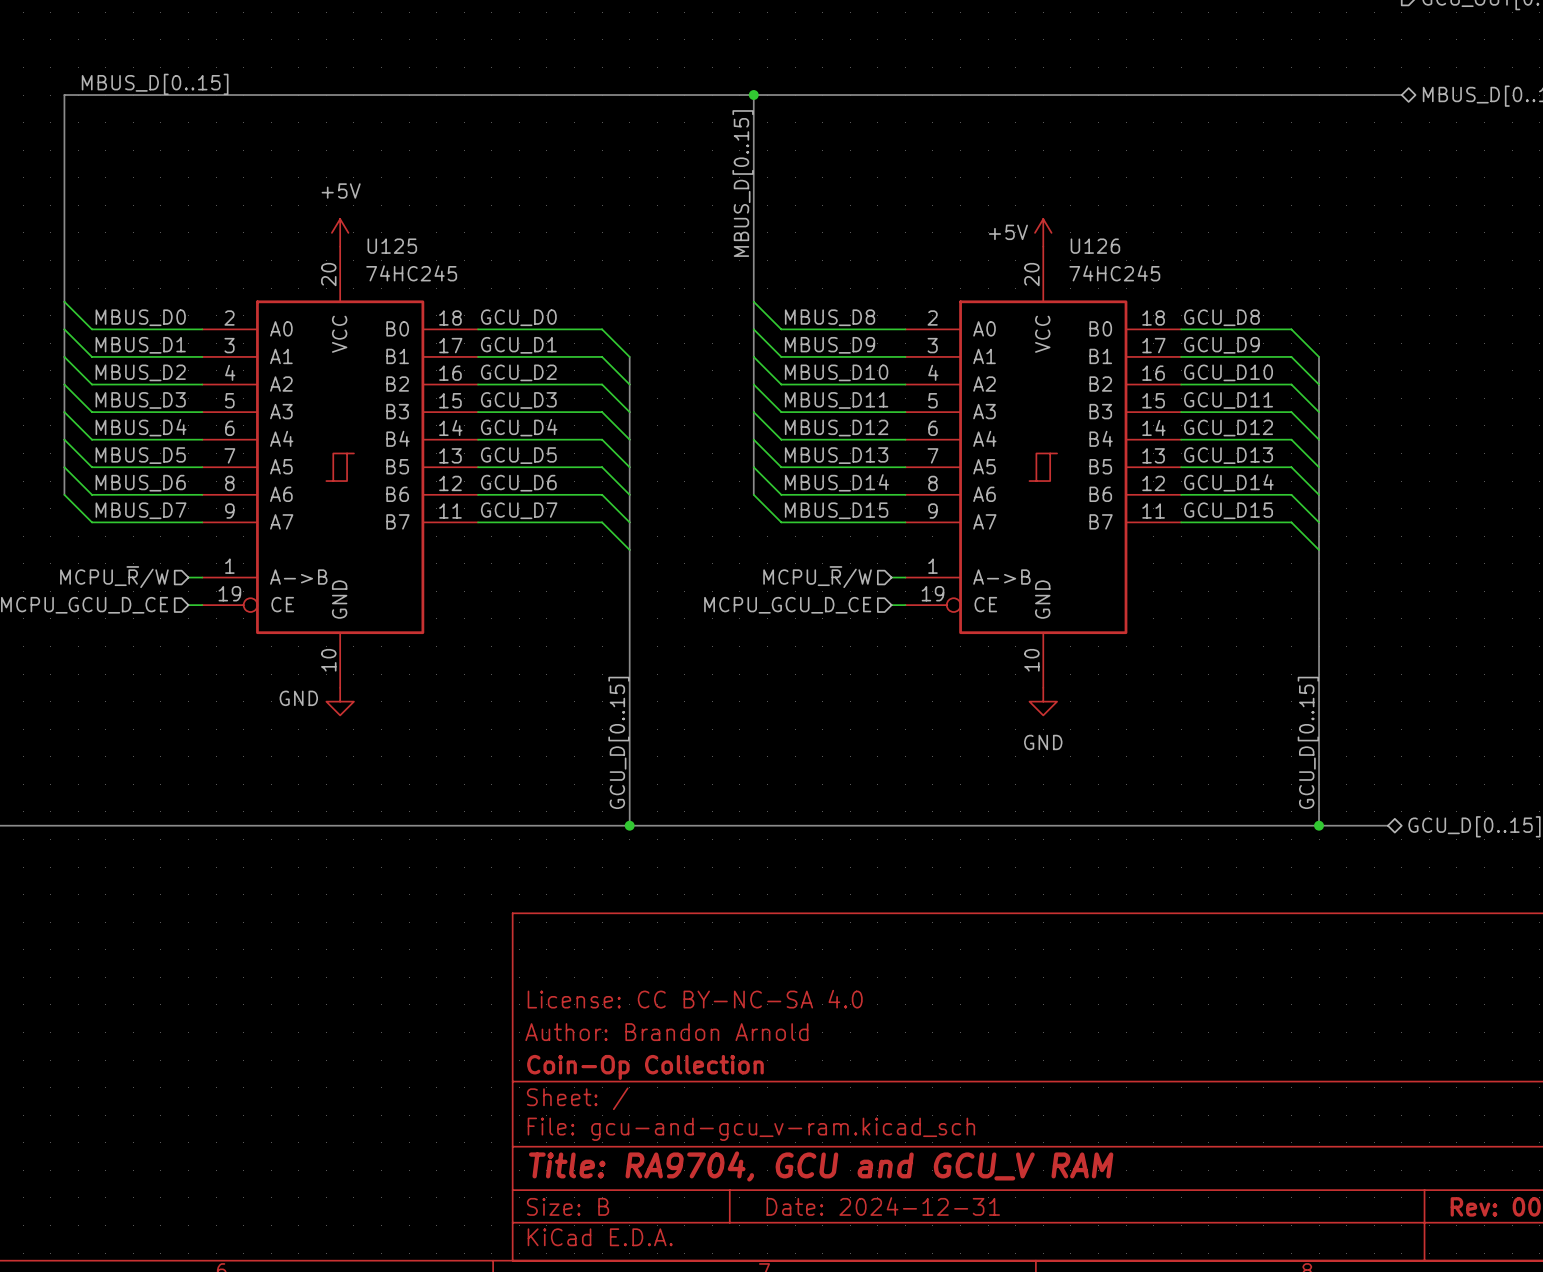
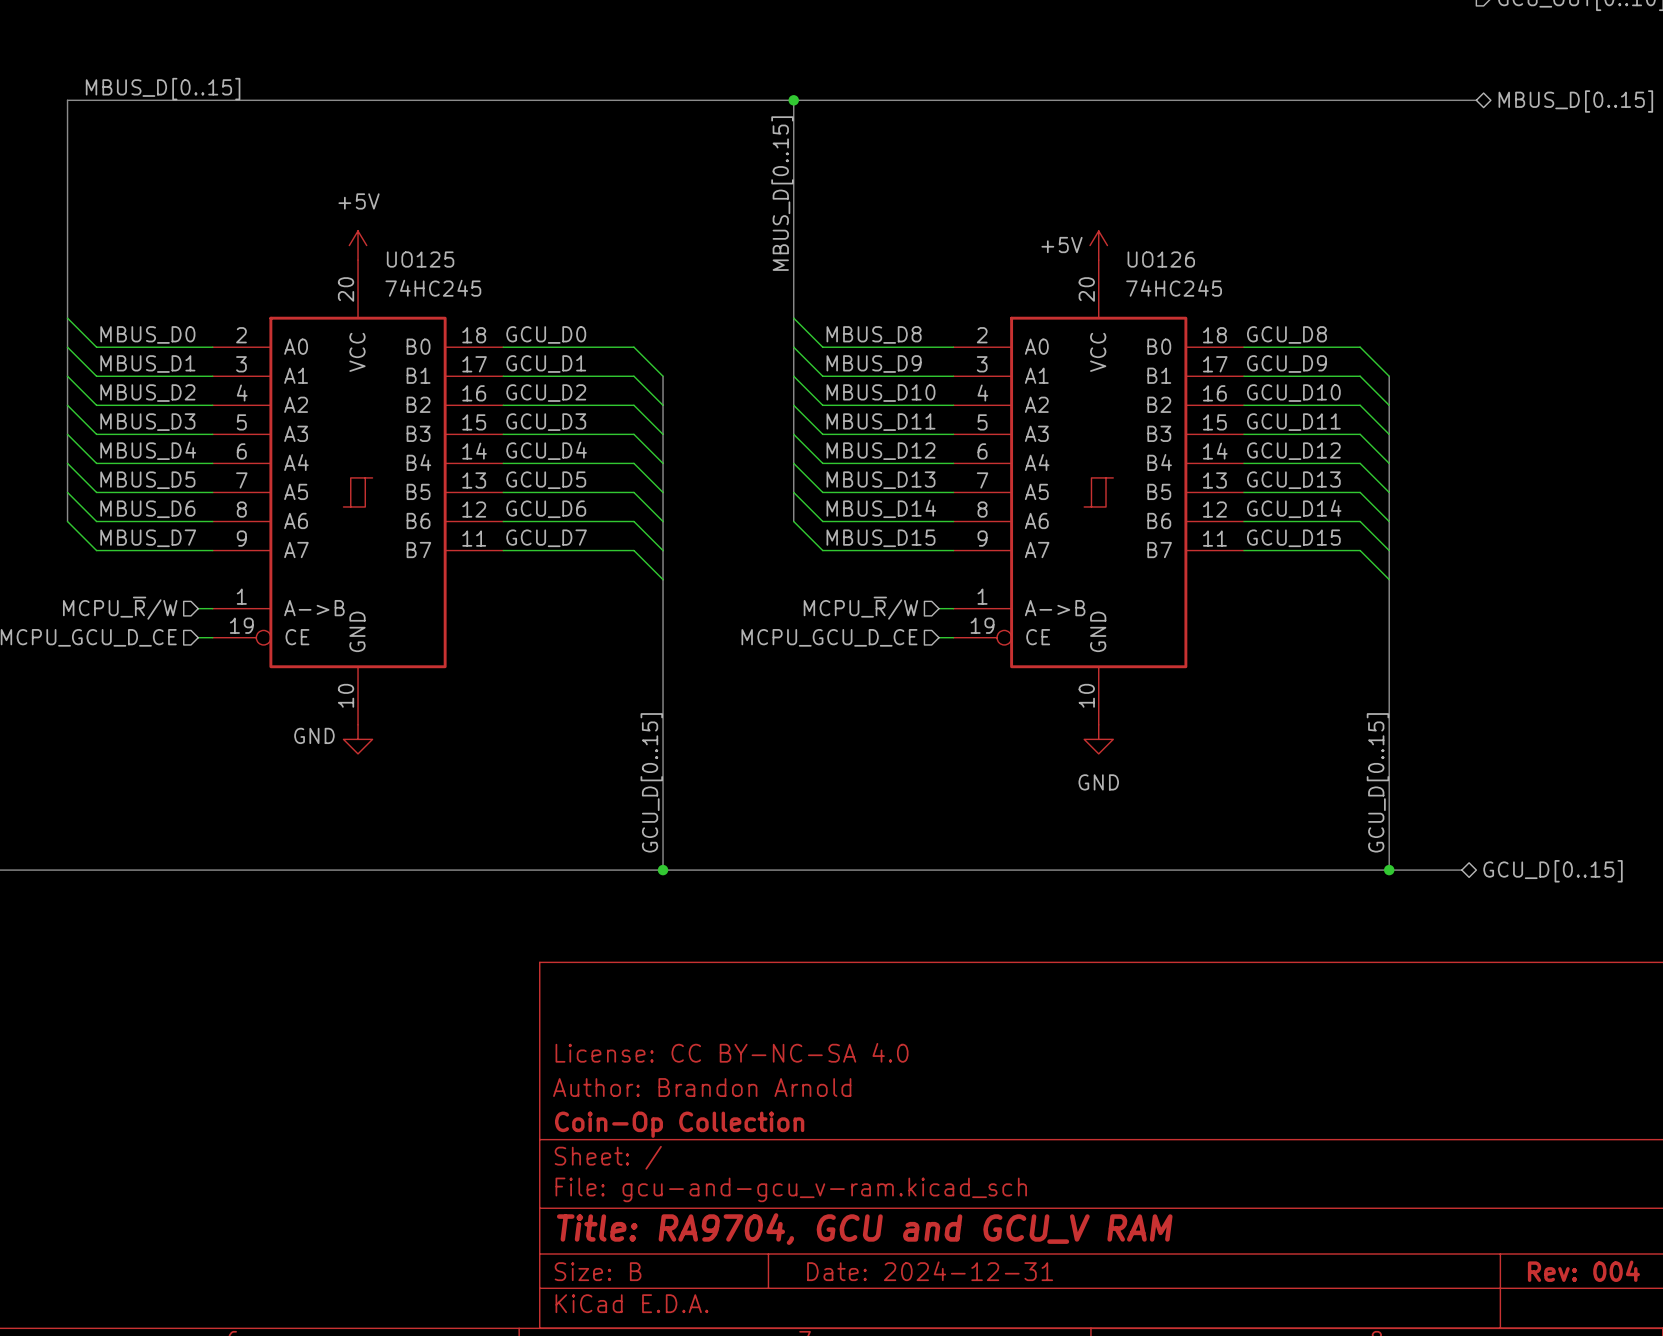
U125 name: U125 (392, 246) -> UO125 (420, 259)
U126 name: U126 (1095, 246) -> UO126 (1161, 259)

